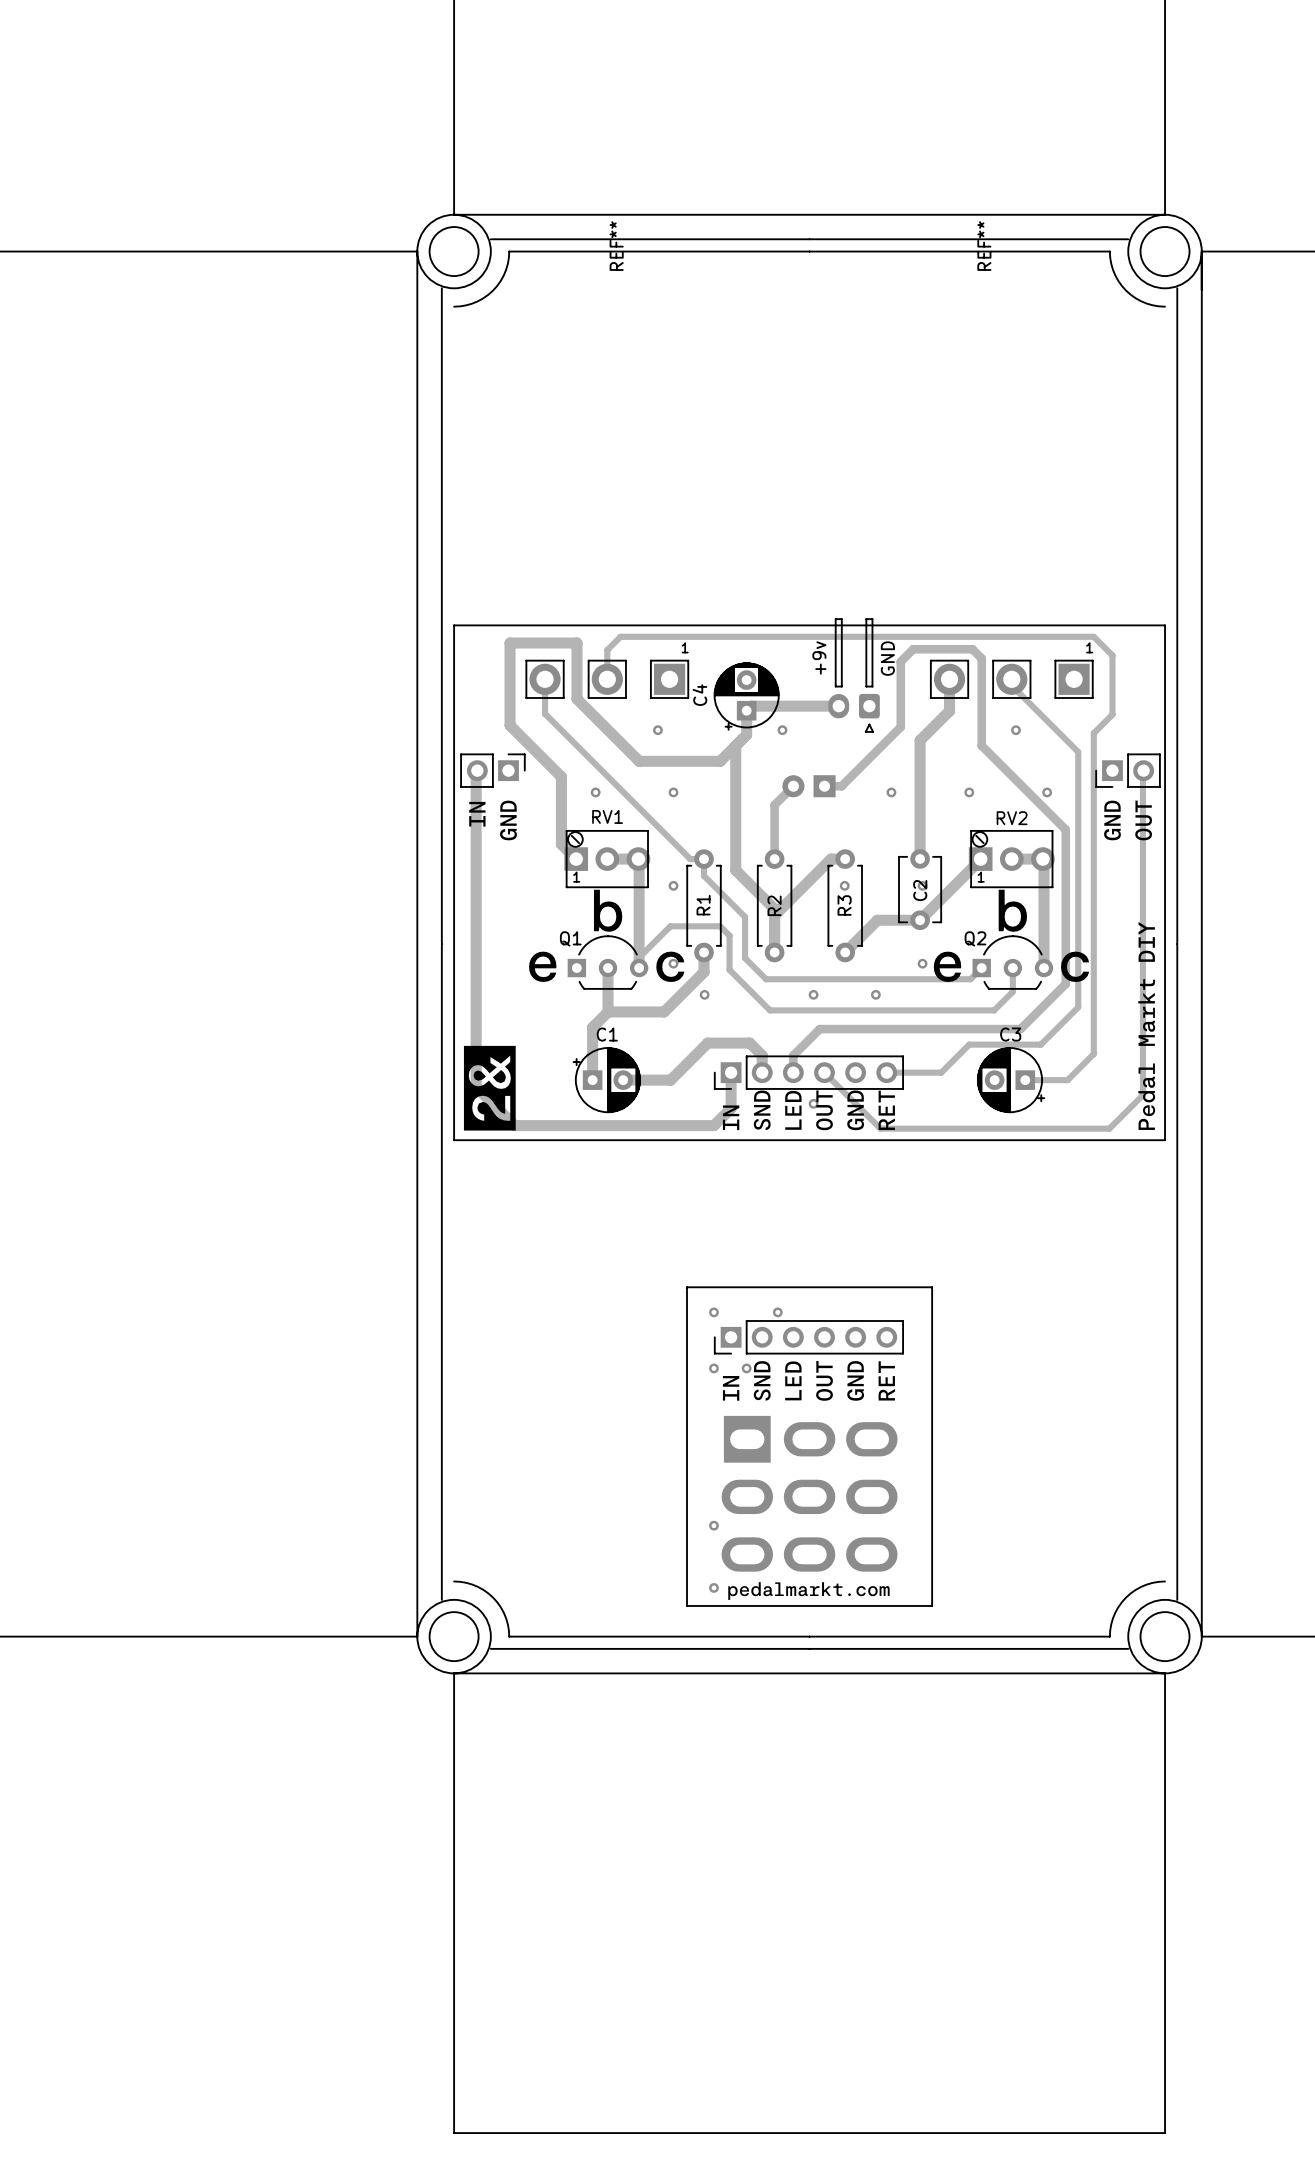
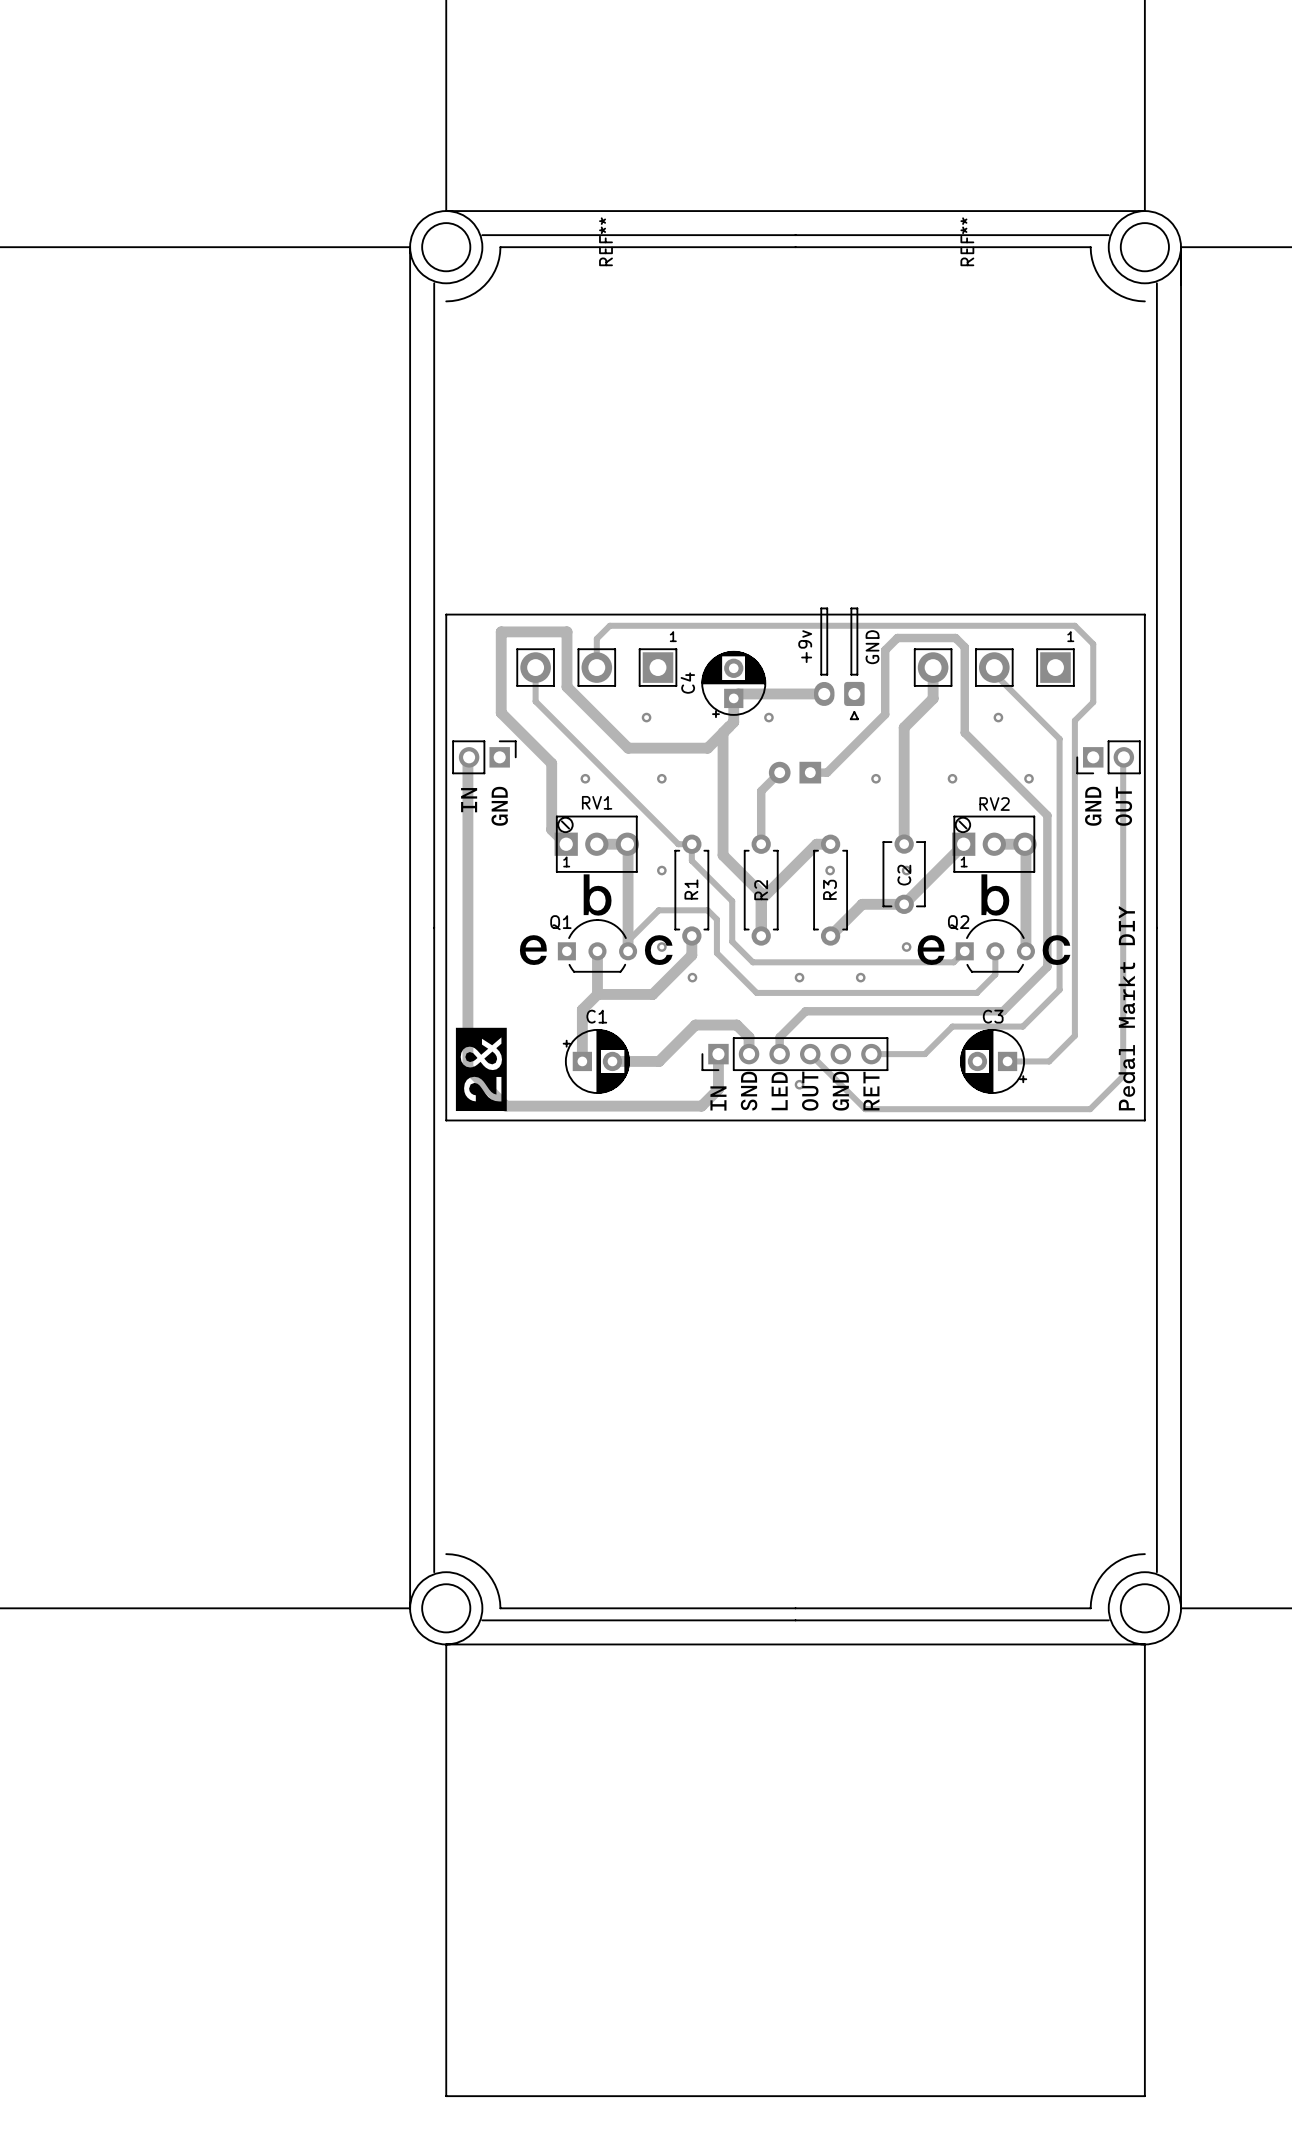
board edge: (686, 1287) (932, 1287) (932, 1605) (686, 1605) (686, 1287) -> none
via: (713, 1312) -> none
via: (777, 1312) -> none
part: (808, 1337) -> none
drawing: [722, 1361, 895, 1401] -> none
via: (713, 1368) -> none
via: (746, 1368) -> none
part: (809, 1493) -> none
via: (713, 1525) -> none
drawing: [728, 1582, 890, 1600] -> none
via: (713, 1587) -> none

